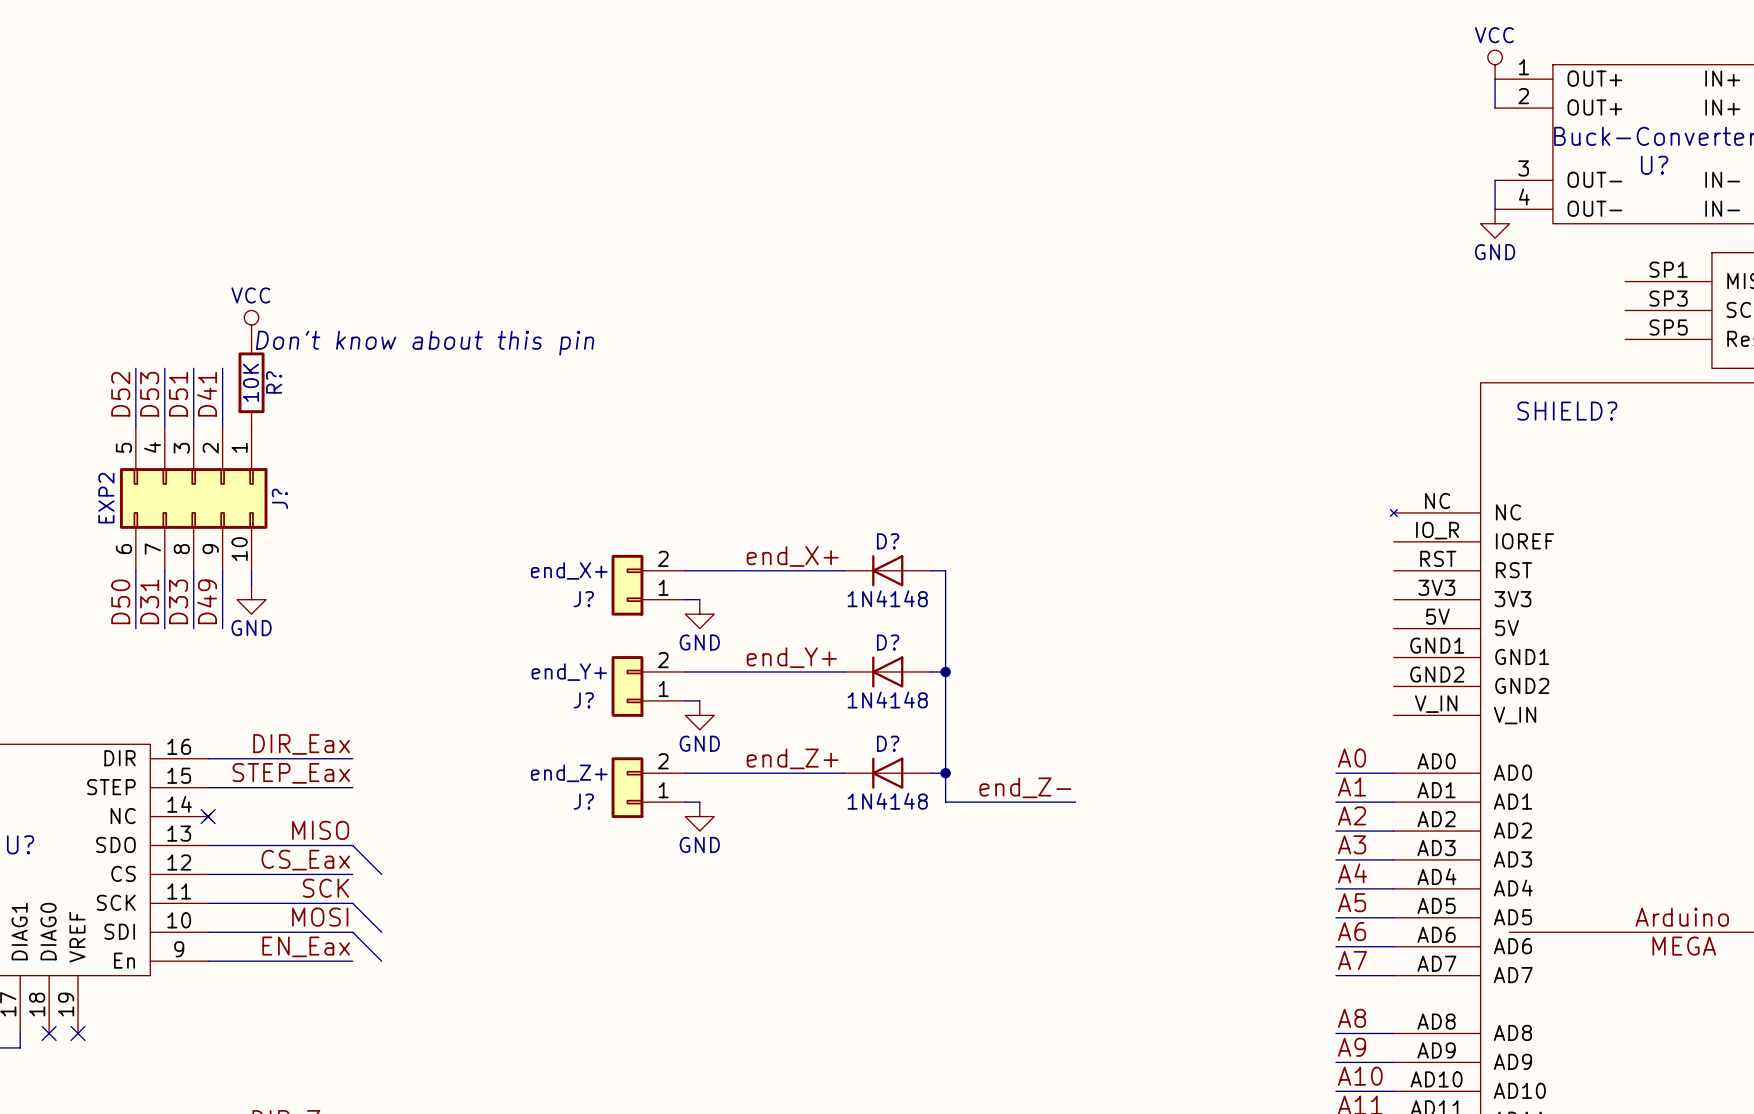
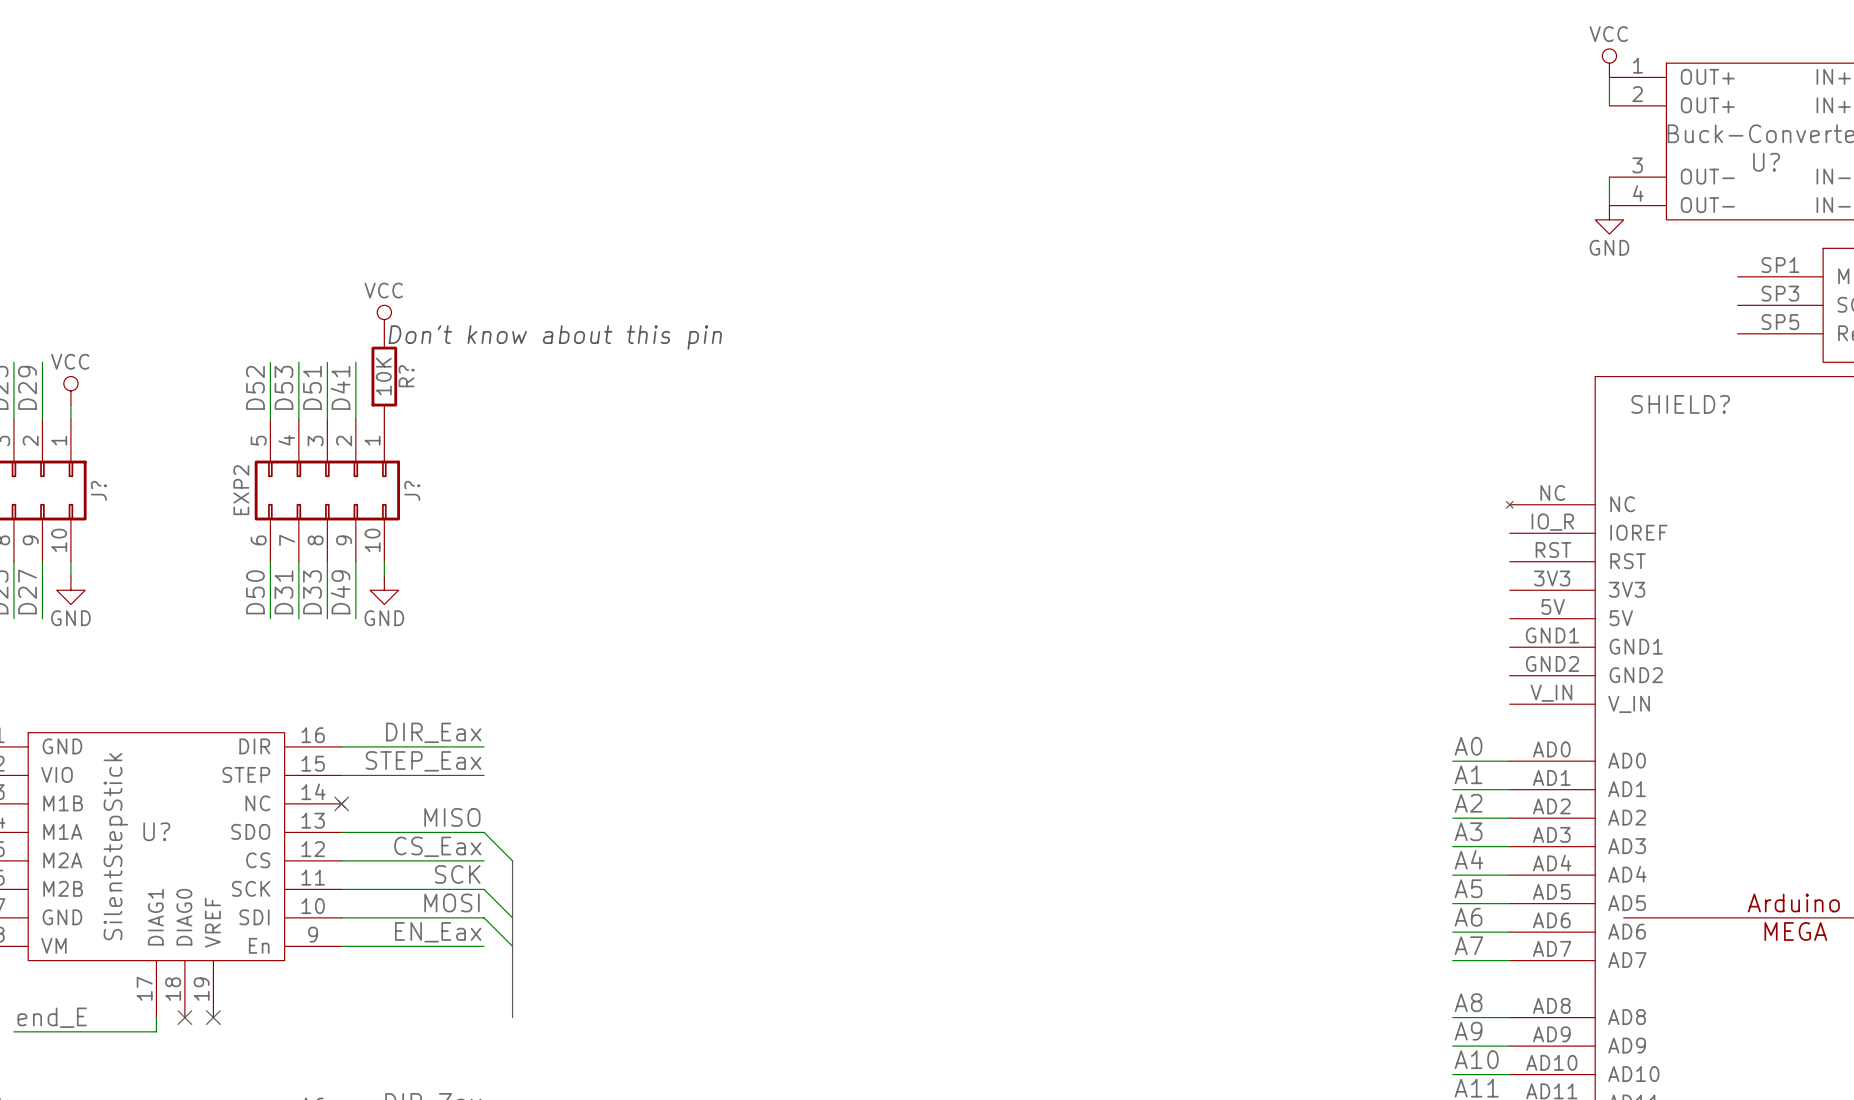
label: end_X+ (792, 556) -> none
wire: (685, 570) (844, 570) -> none
D?: 1N4148 (887, 570) -> none
wire: (931, 570) (945, 570) (945, 802) (1075, 802) -> none
J?: end_X+ (648, 585) -> none
wire: (685, 599) (699, 599) -> none
power symbol: GND (699, 614) -> none
label: end_Y+ (791, 657) -> none
wire: (685, 671) (844, 671) -> none
D?: 1N4148 (887, 671) -> none
wire: (931, 671) (945, 671) -> none
junction: (945, 671) -> none
J?: end_Y+ (648, 686) -> none
wire: (685, 700) (699, 700) -> none
power symbol: GND (699, 715) -> none
label: end_Z+ (792, 758) -> none
wire: (685, 773) (844, 773) -> none
D?: 1N4148 (887, 773) -> none
wire: (931, 773) (945, 773) -> none
junction: (945, 773) -> none
J?: end_Z+ (648, 787) -> none
label: end_Z- (1025, 787) -> none
wire: (685, 802) (699, 802) -> none
power symbol: GND (699, 816) -> none
bus: none -> (512, 860) (512, 1017)

